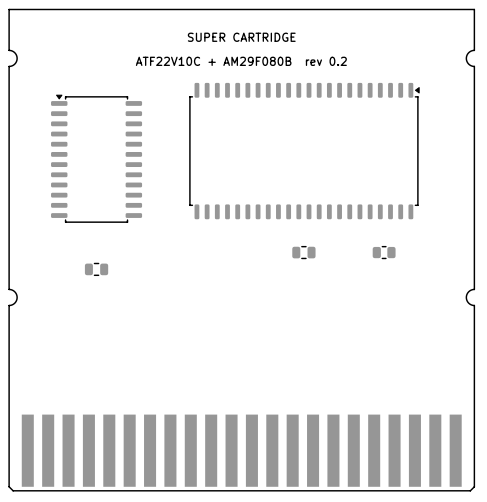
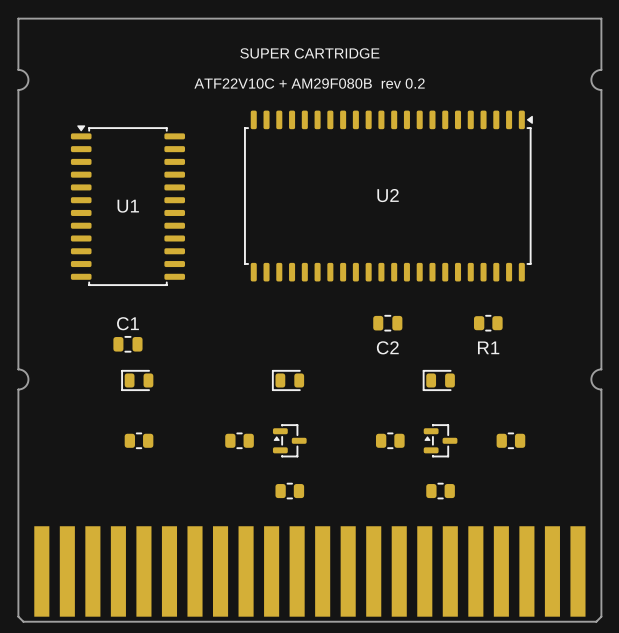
U2 name: none -> U2 (388, 195)
U1 name: none -> U1 (128, 206)
C1 name: none -> C1 (127, 323)
C2 name: none -> C2 (387, 347)
R1 name: none -> R1 (488, 347)
part: none -> (137, 380)
part: none -> (288, 380)
part: none -> (438, 380)
part: none -> (139, 440)
part: none -> (239, 440)
part: none -> (289, 440)
part: none -> (390, 440)
part: none -> (440, 440)
part: none -> (510, 440)
part: none -> (289, 491)
part: none -> (440, 491)

